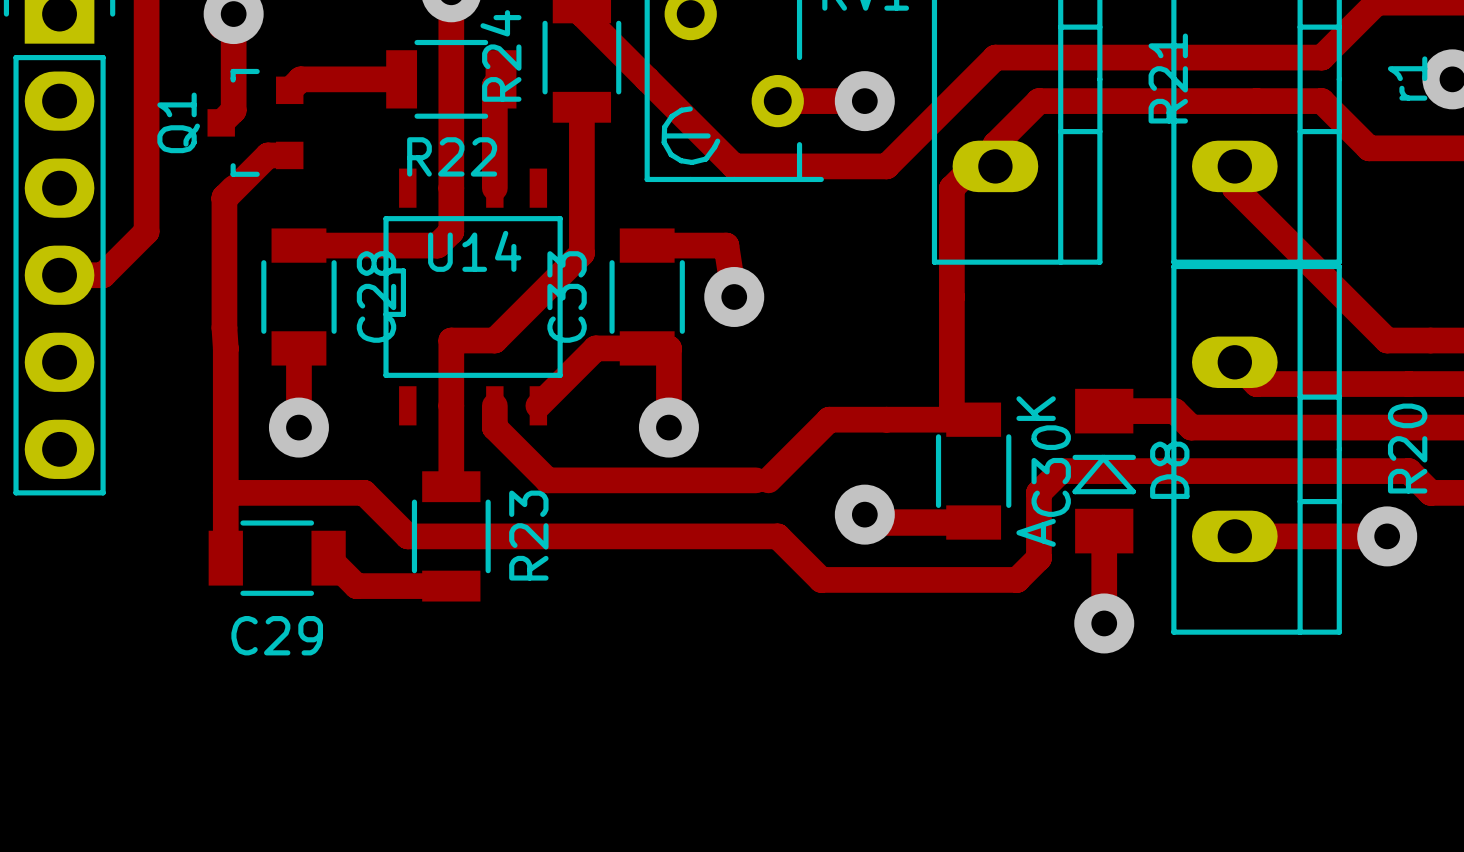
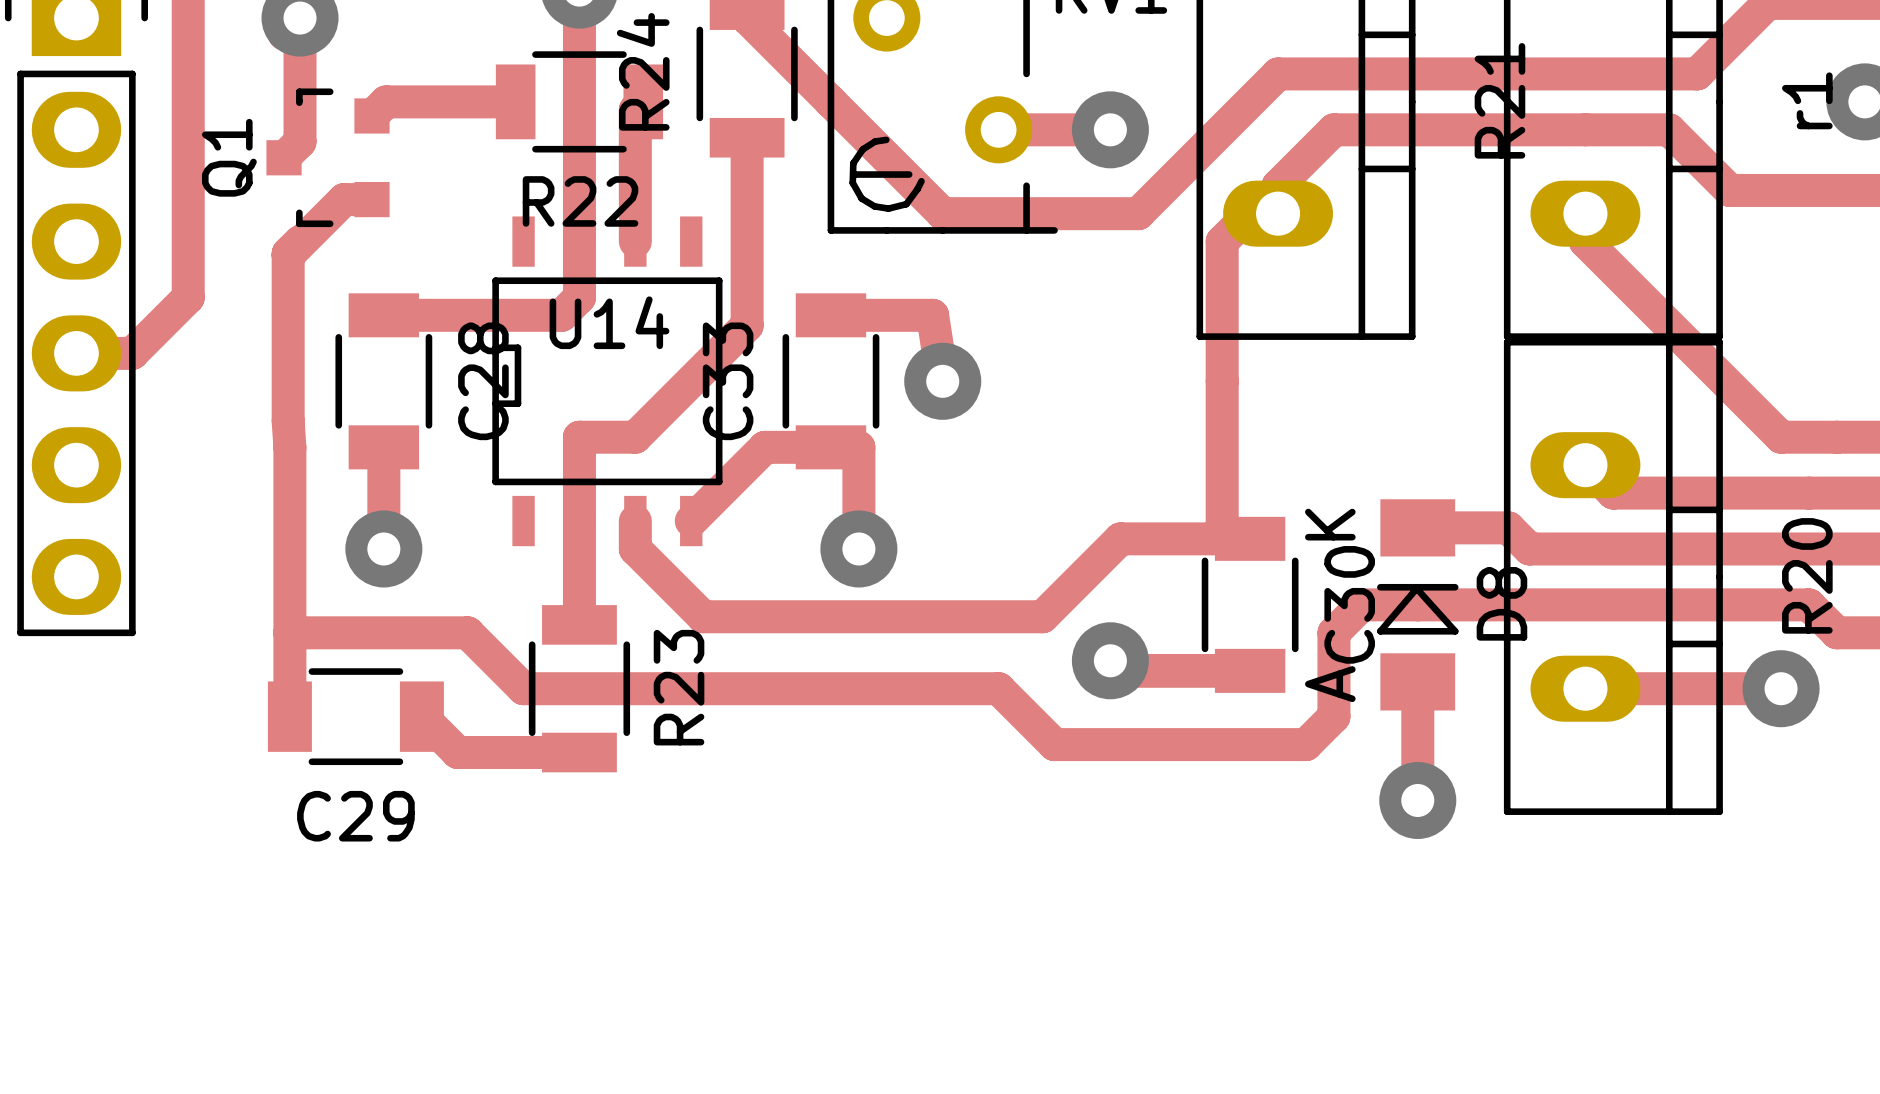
track: (1300, 101) (1321, 101) (1369, 148) -> (1669, 129) (1729, 190) (1757, 190)
track: (872, 419) (829, 419) (768, 480) -> (1120, 538) (1042, 616) (970, 616)

